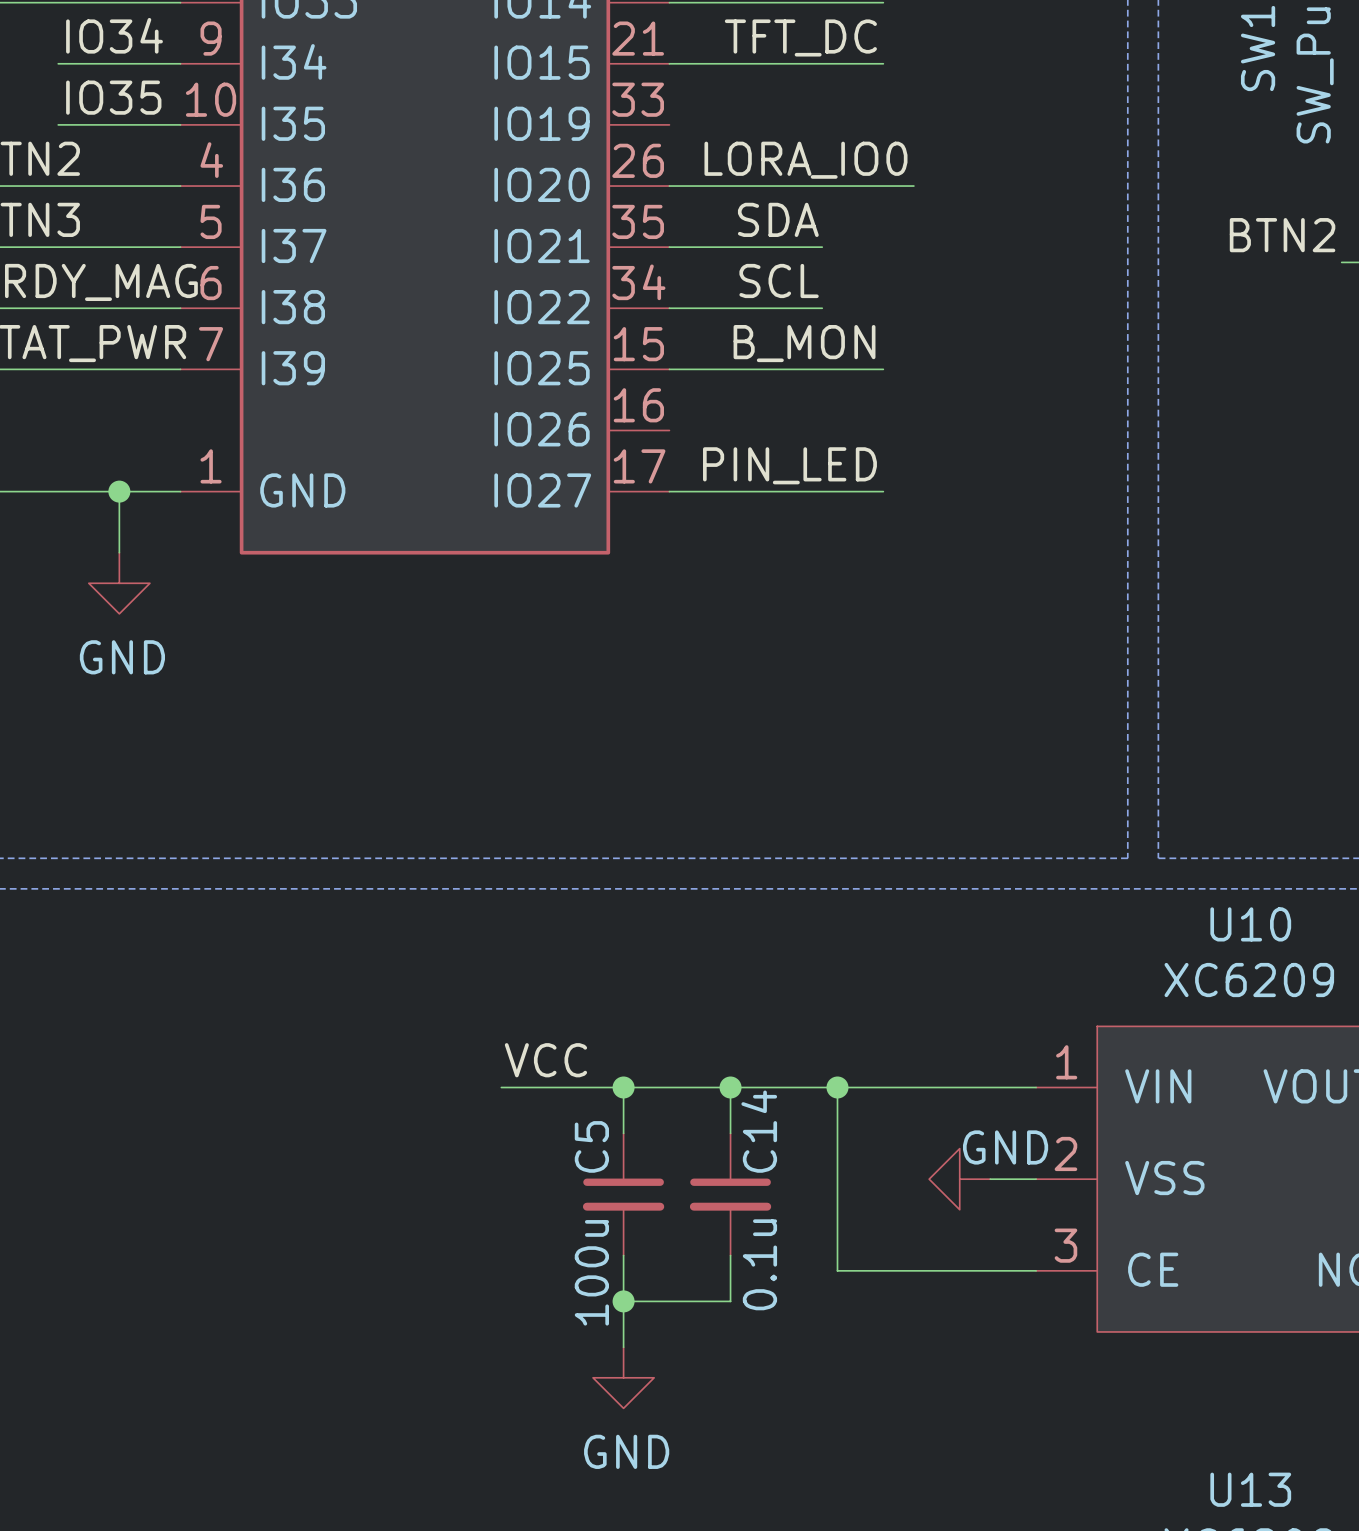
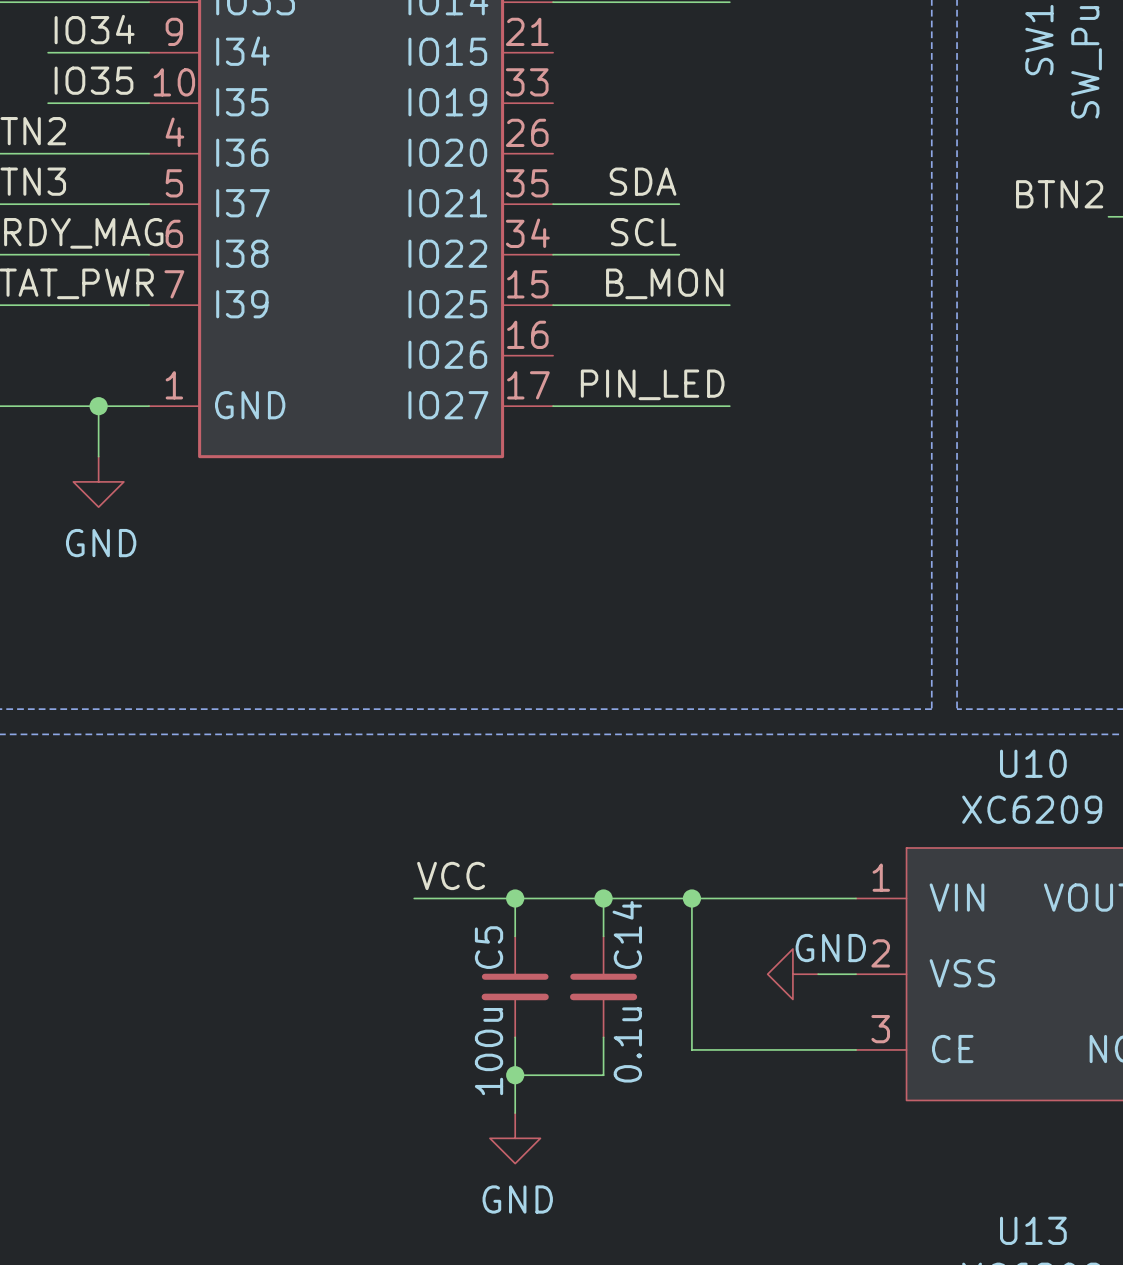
label: TFT_DC (800, 37) -> none
wire: (669, 63) (883, 63) -> none
label: LORA_IO0 (805, 160) -> none
wire: (669, 186) (913, 186) -> none

